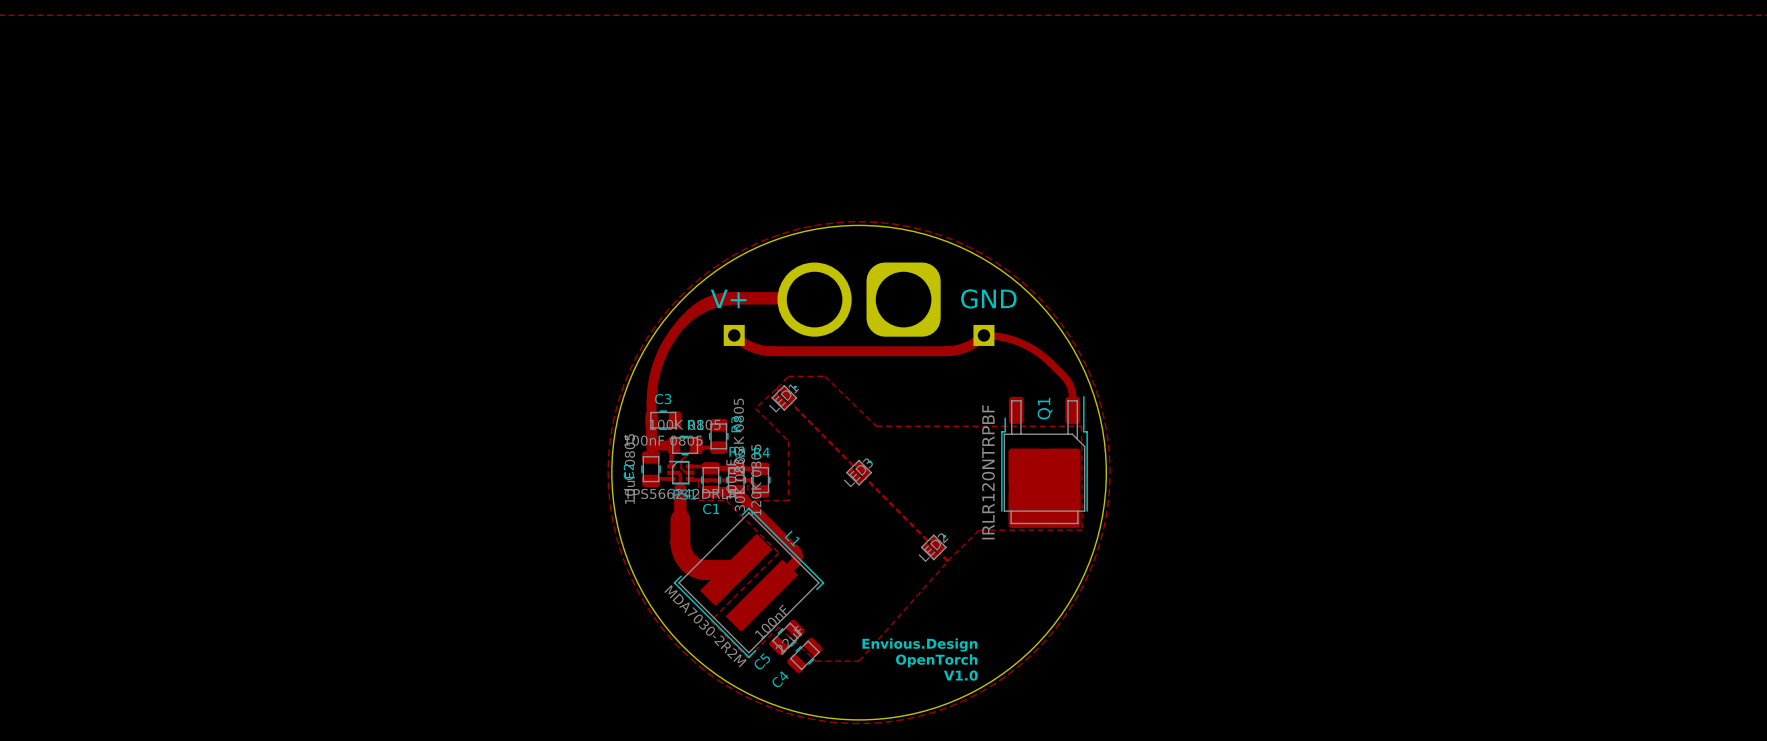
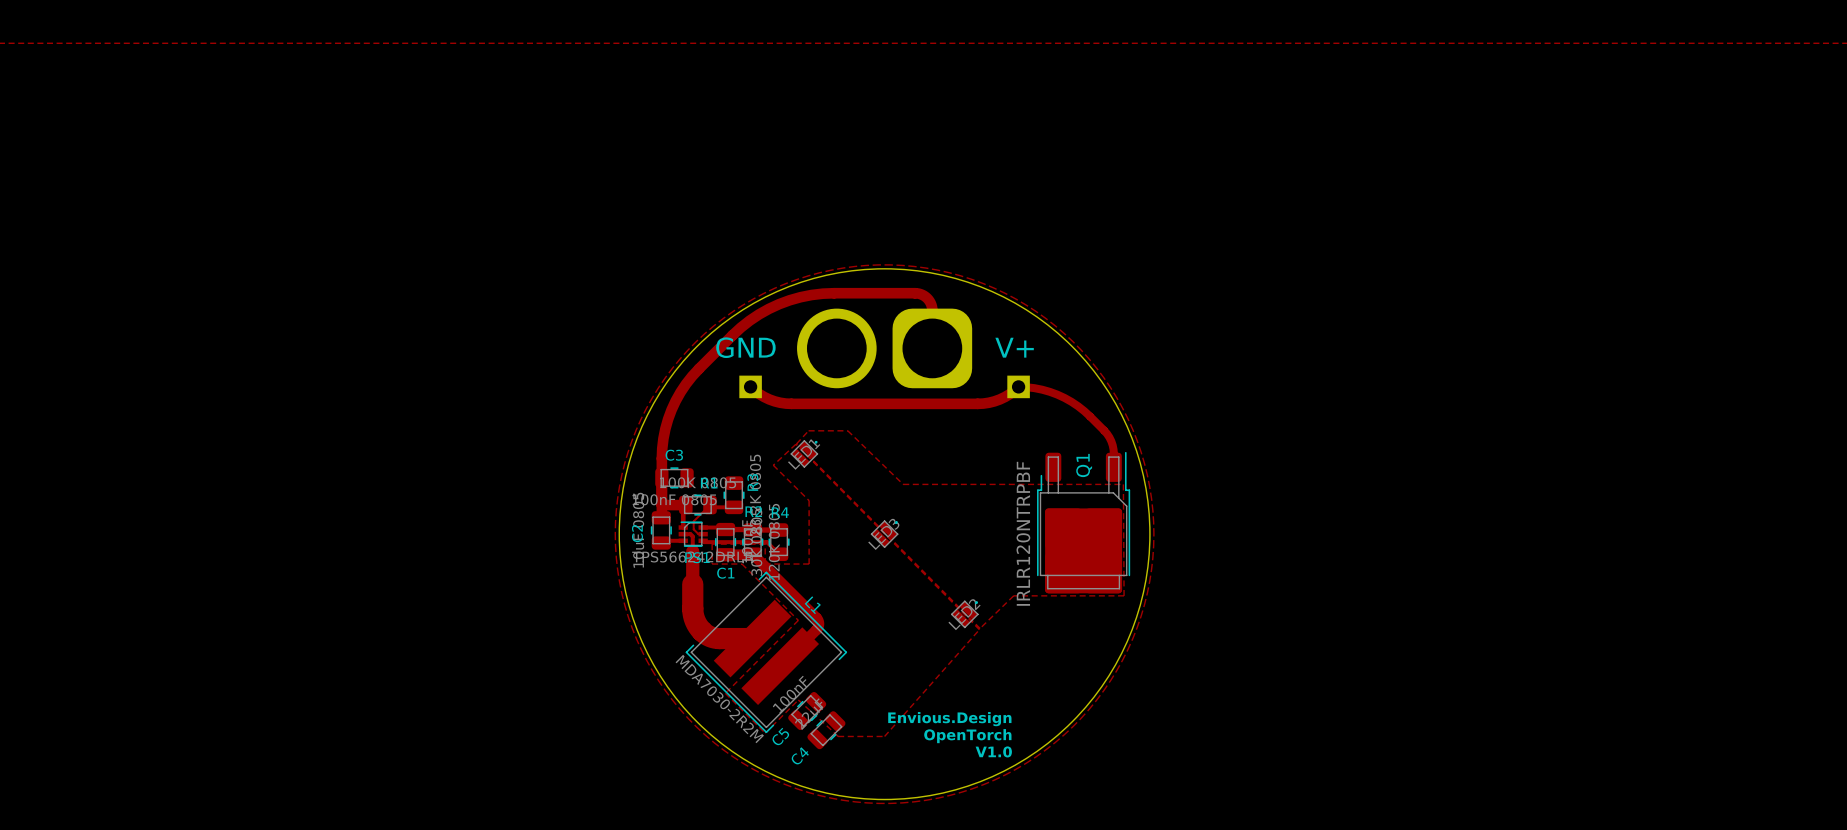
text: V+ (728, 298) -> GND (745, 347)
text: GND (988, 298) -> V+ (1014, 347)
top track: (691, 313) (709, 301) (725, 297) (808, 297) (814, 299) (722, 301) (700, 308) (682, 322) -> (704, 363) (740, 327) (759, 314) (789, 300) (822, 293) (914, 293) (922, 294) (928, 299) (931, 306) (932, 348)

